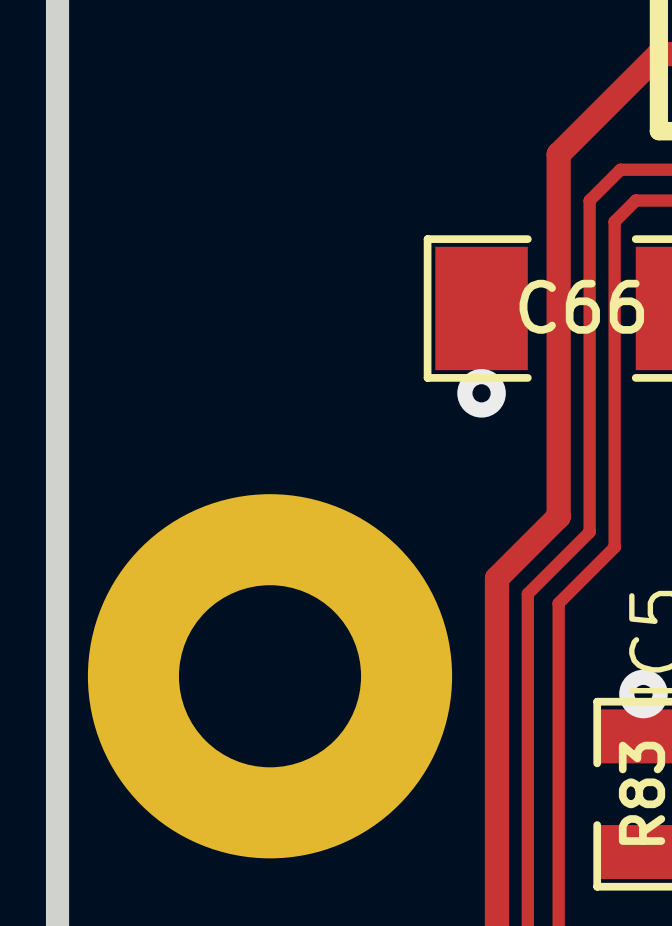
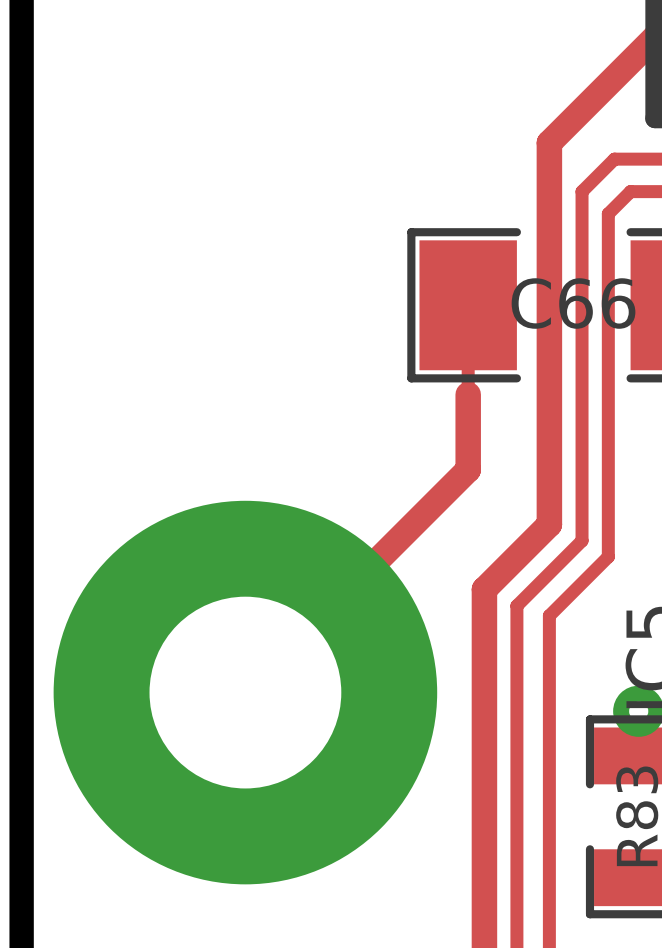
track: none -> (468, 394) (468, 469) (245, 692)
via: (481, 393) -> none

